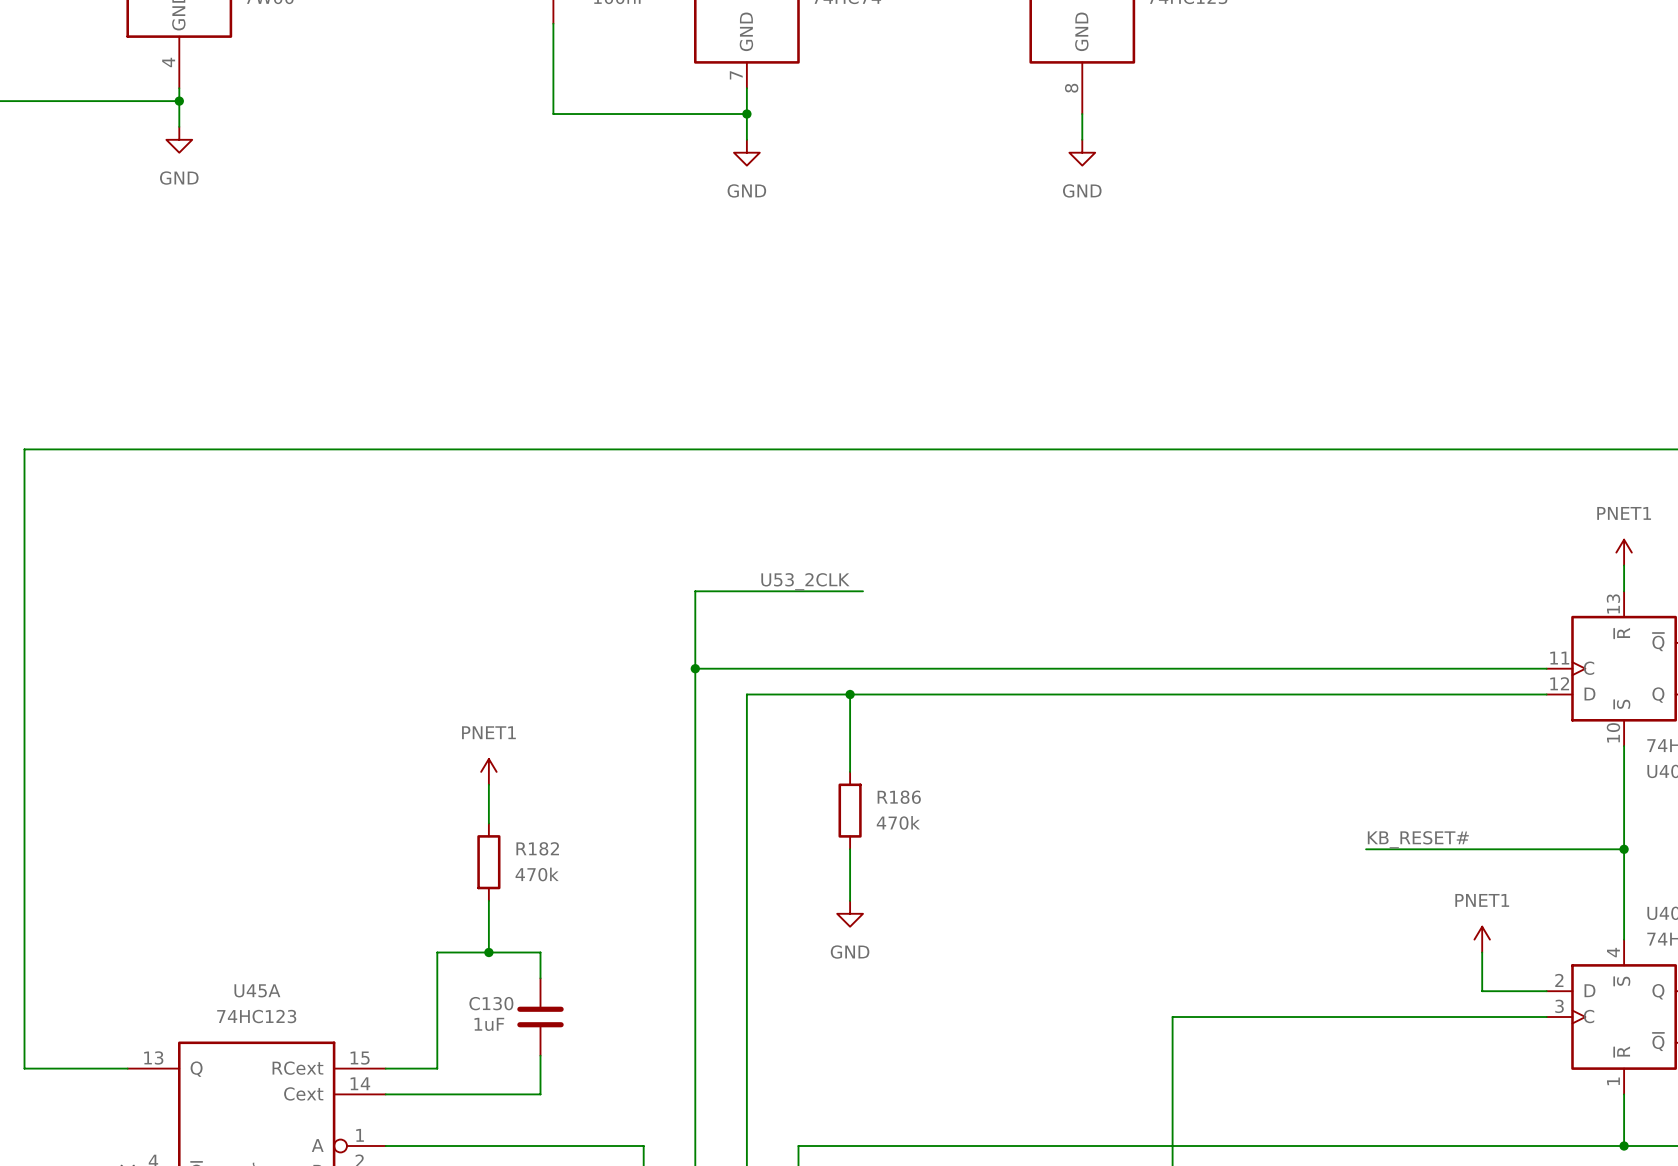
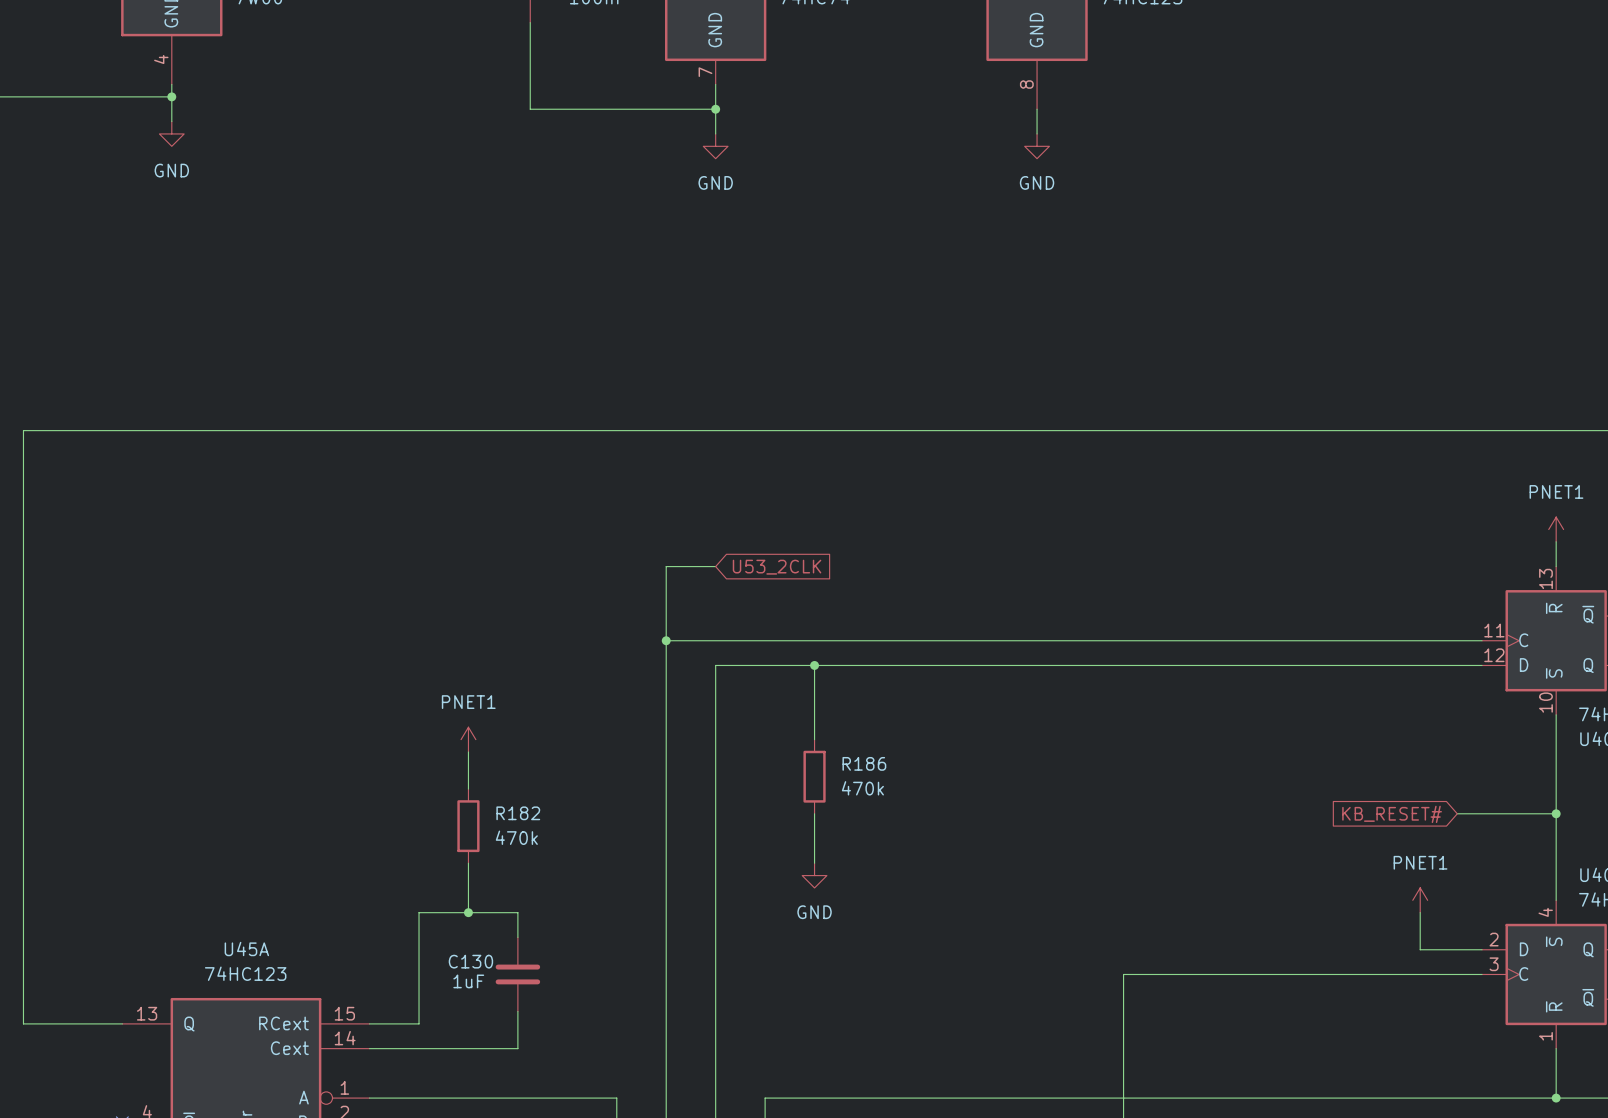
label: U53_2CLK (805, 581) -> none
wire: (746, 591) (862, 591) -> none
global label: none -> U53_2CLK (777, 567)
label: KB_RESET# (1418, 839) -> none
wire: (1366, 849) (1520, 849) -> none
global label: none -> KB_RESET# (1392, 814)

